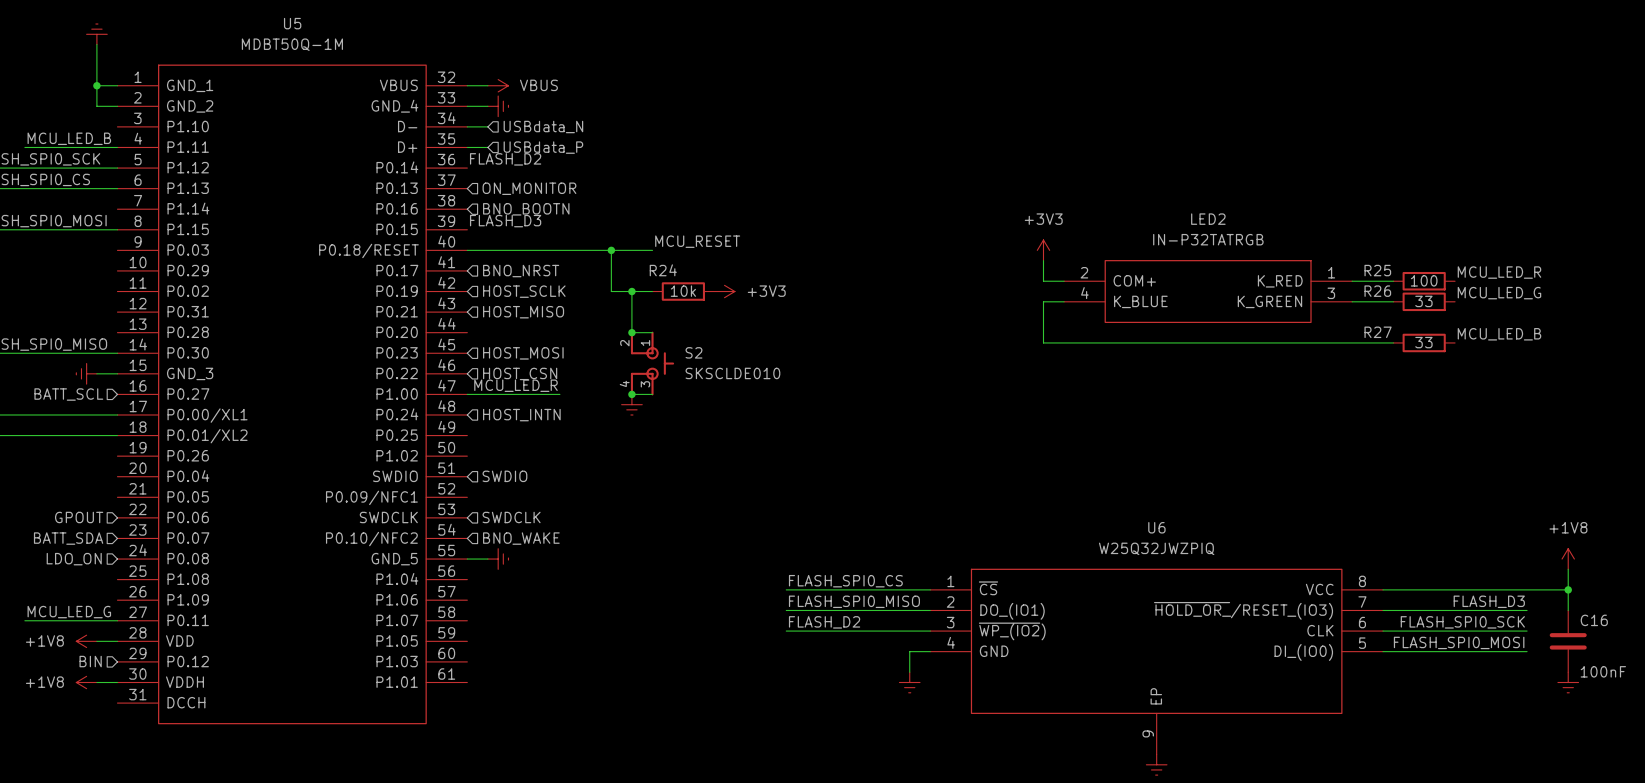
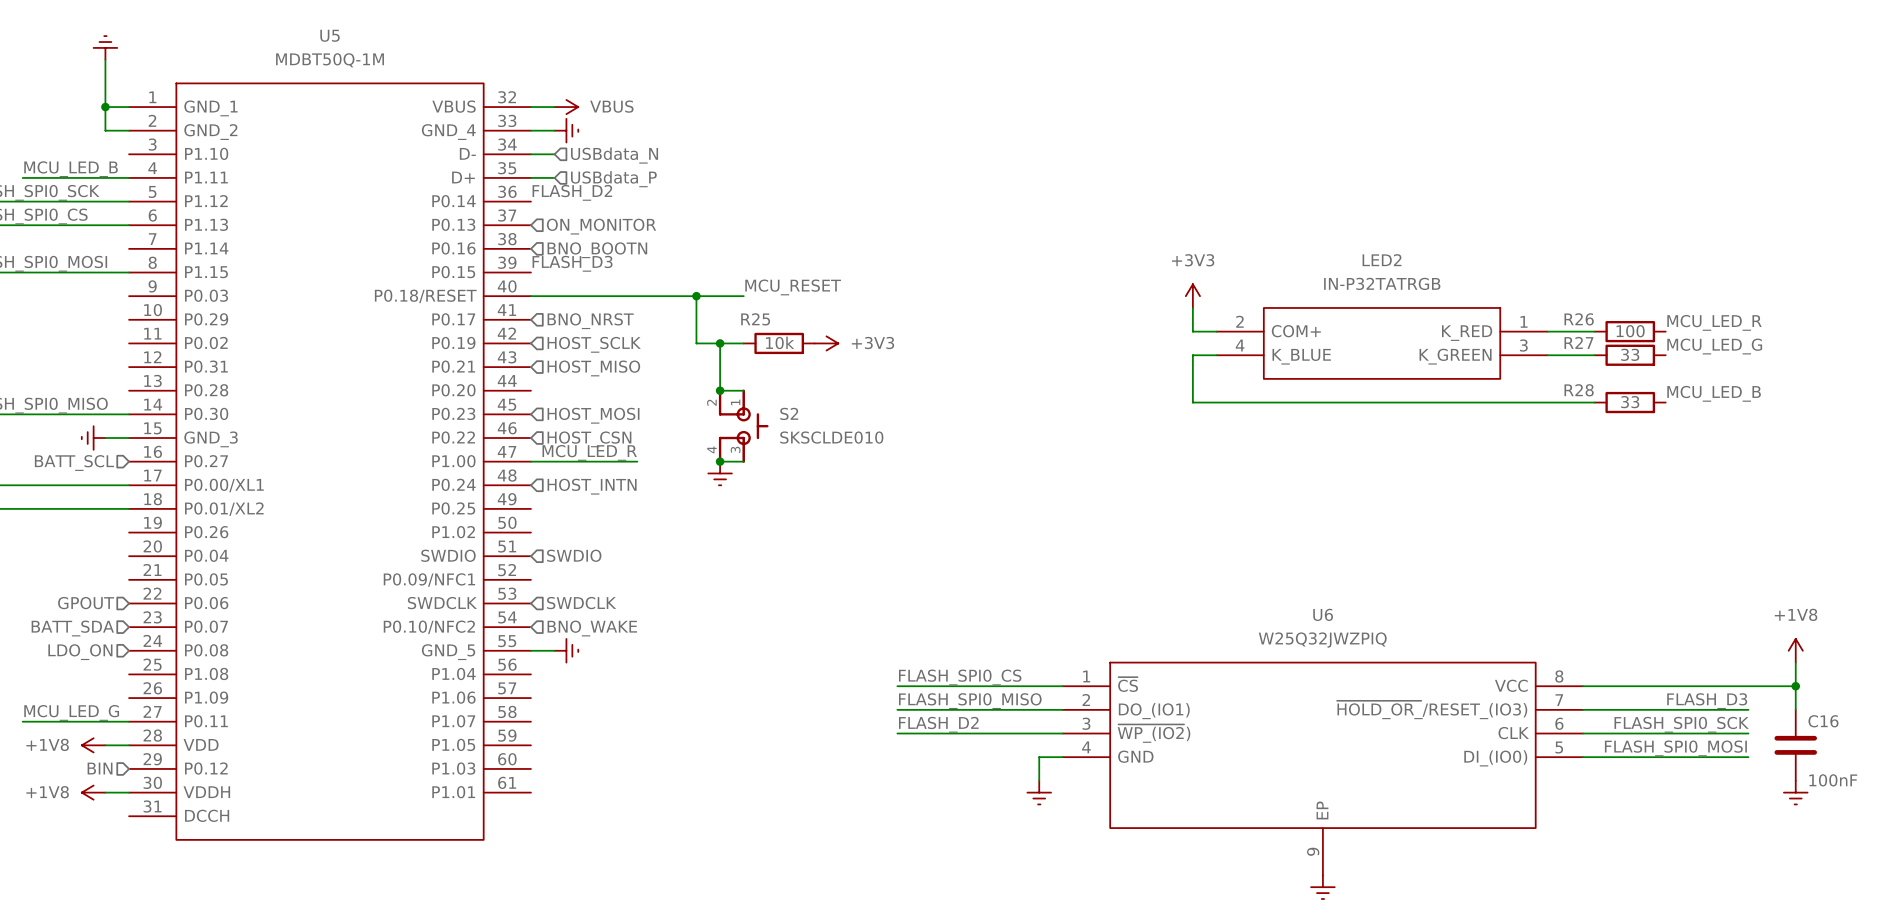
R24 name: R24 (663, 270) -> R25 (755, 319)
R25 name: R25 (1377, 270) -> R26 (1579, 319)
R26 name: R26 (1377, 291) -> R27 (1578, 342)
R27 name: R27 (1378, 332) -> R28 (1579, 390)

